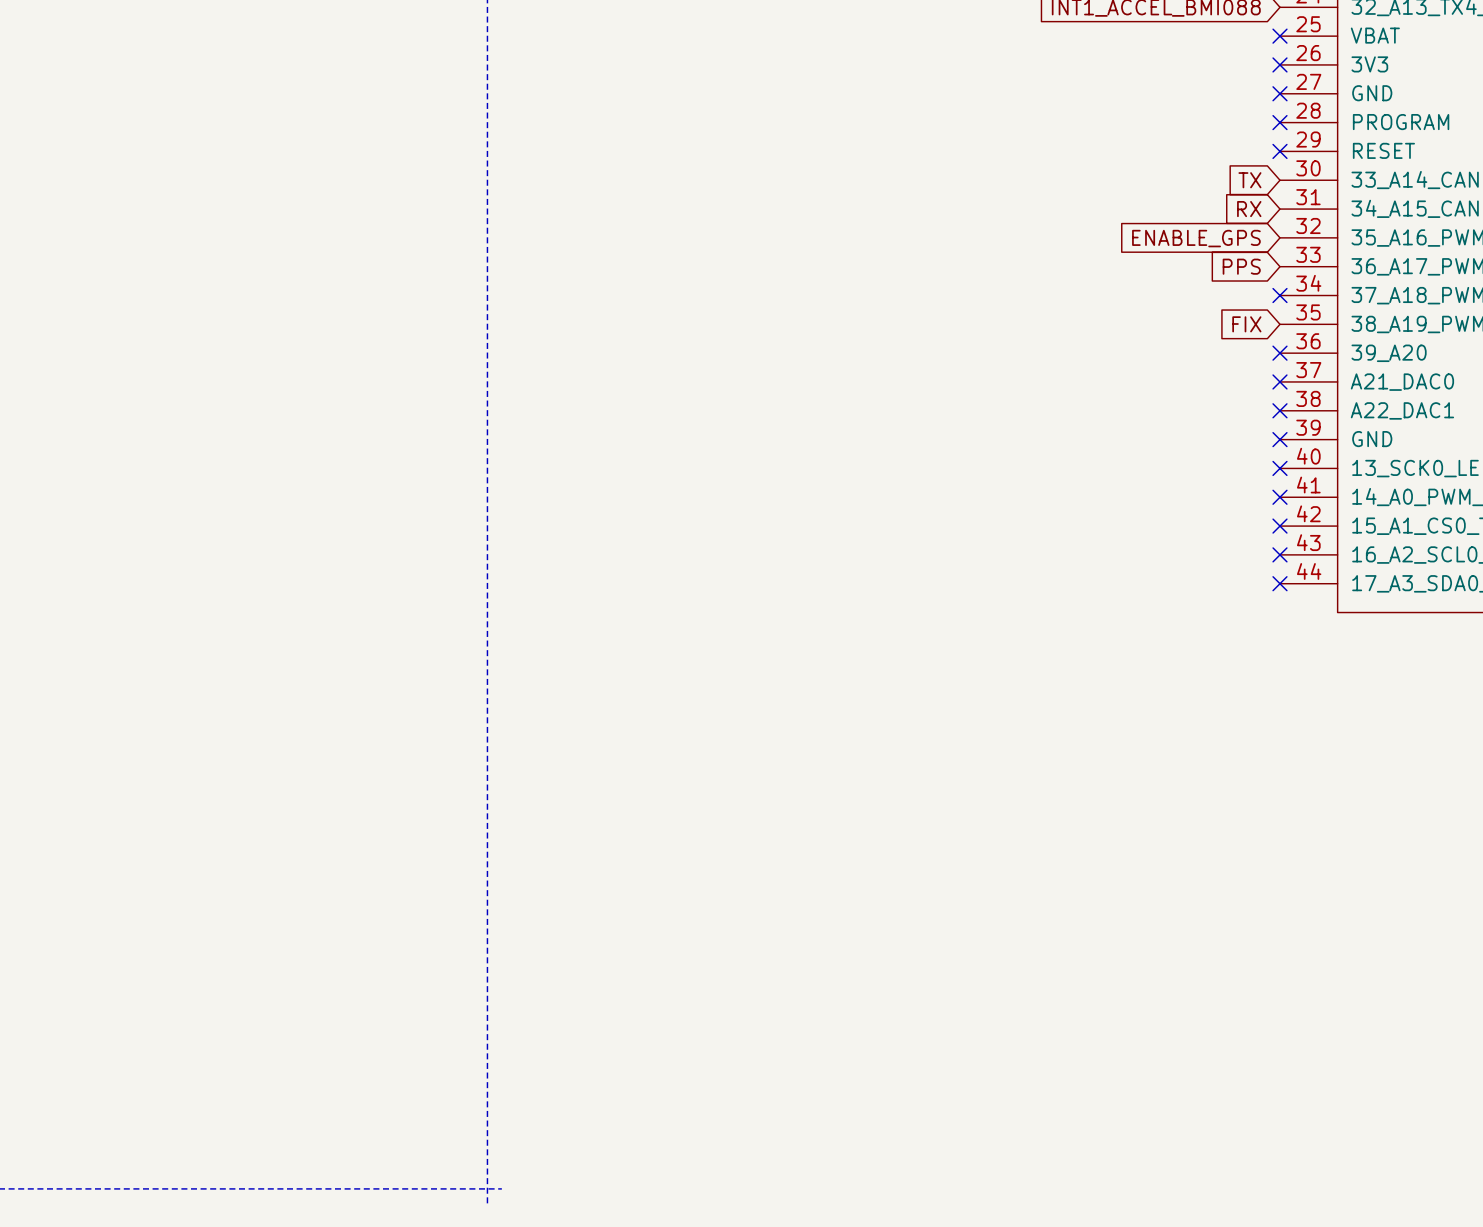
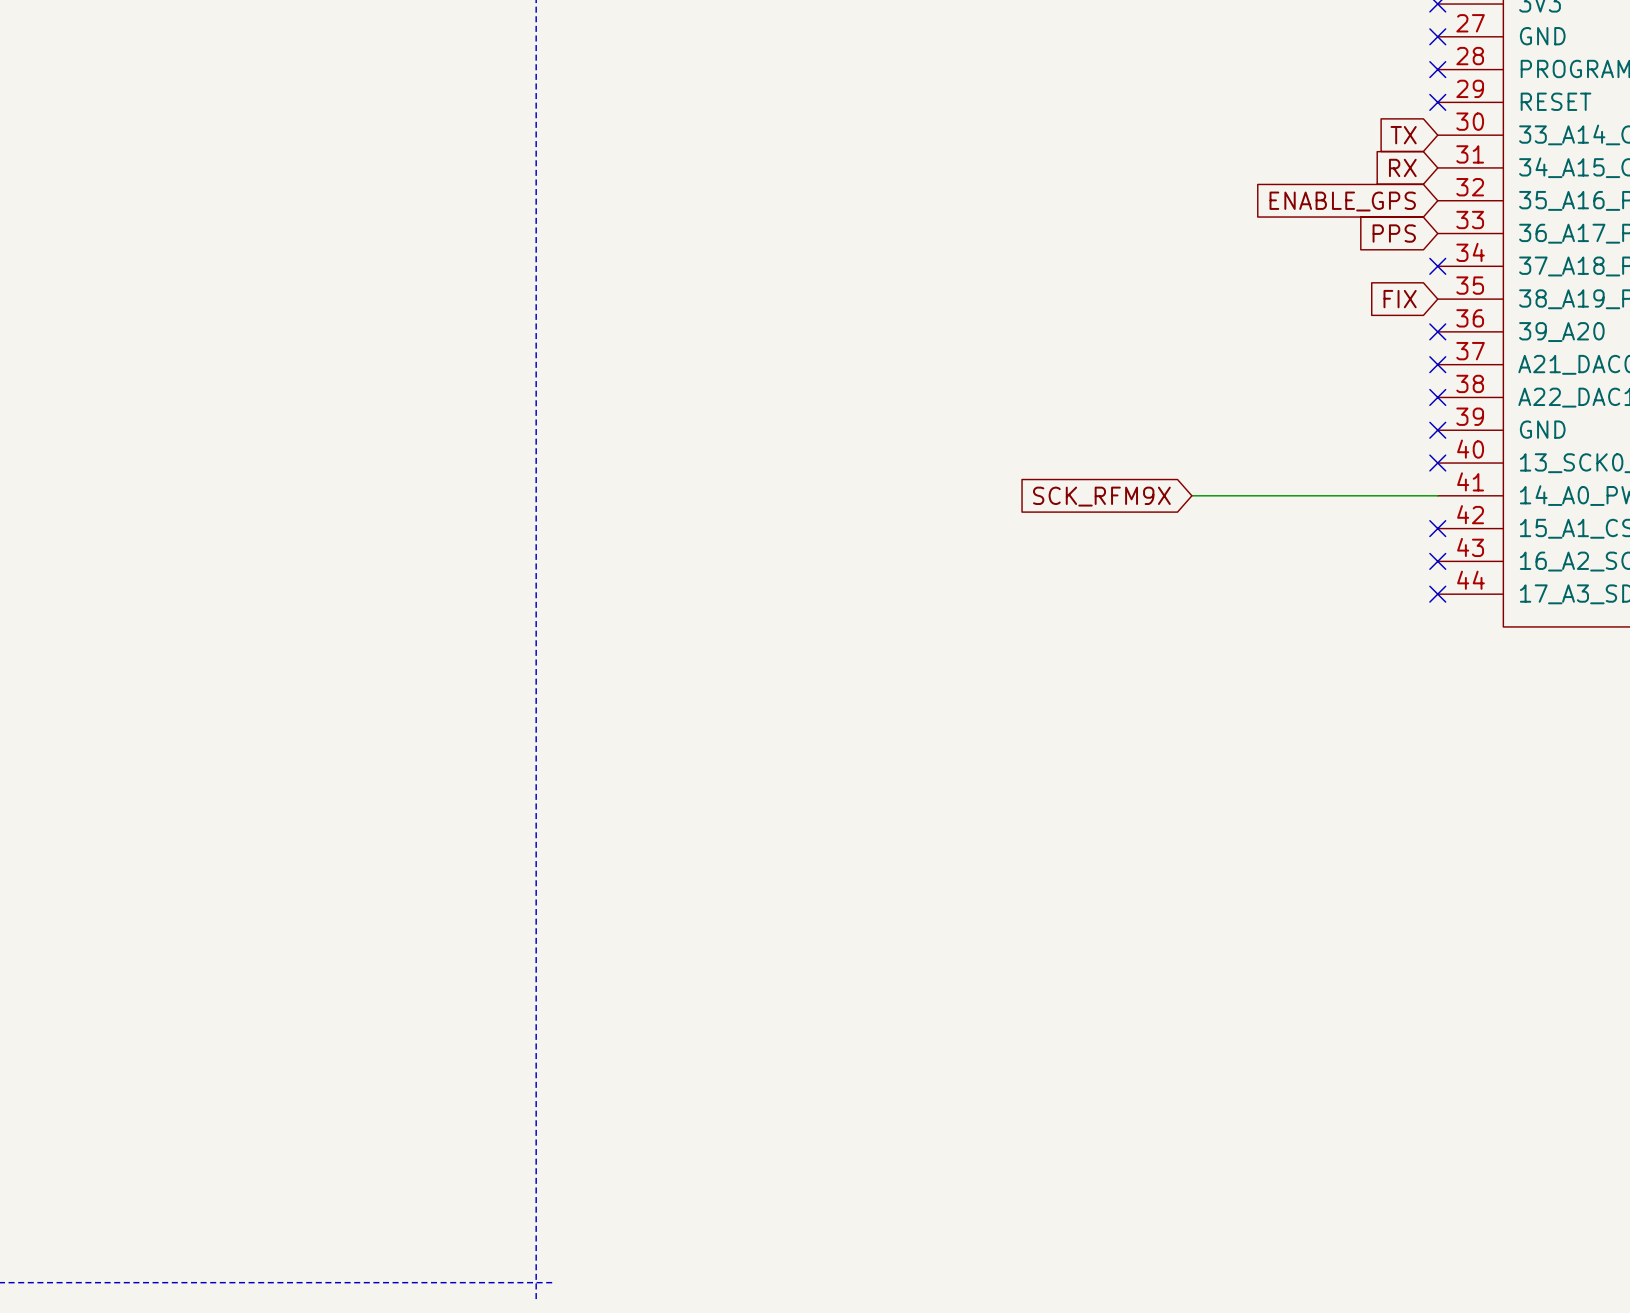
global label: none -> SCK_RFM9X (1101, 496)
wire: none -> (1191, 495) (1437, 495)
no-connect mark: (1279, 497) -> none

